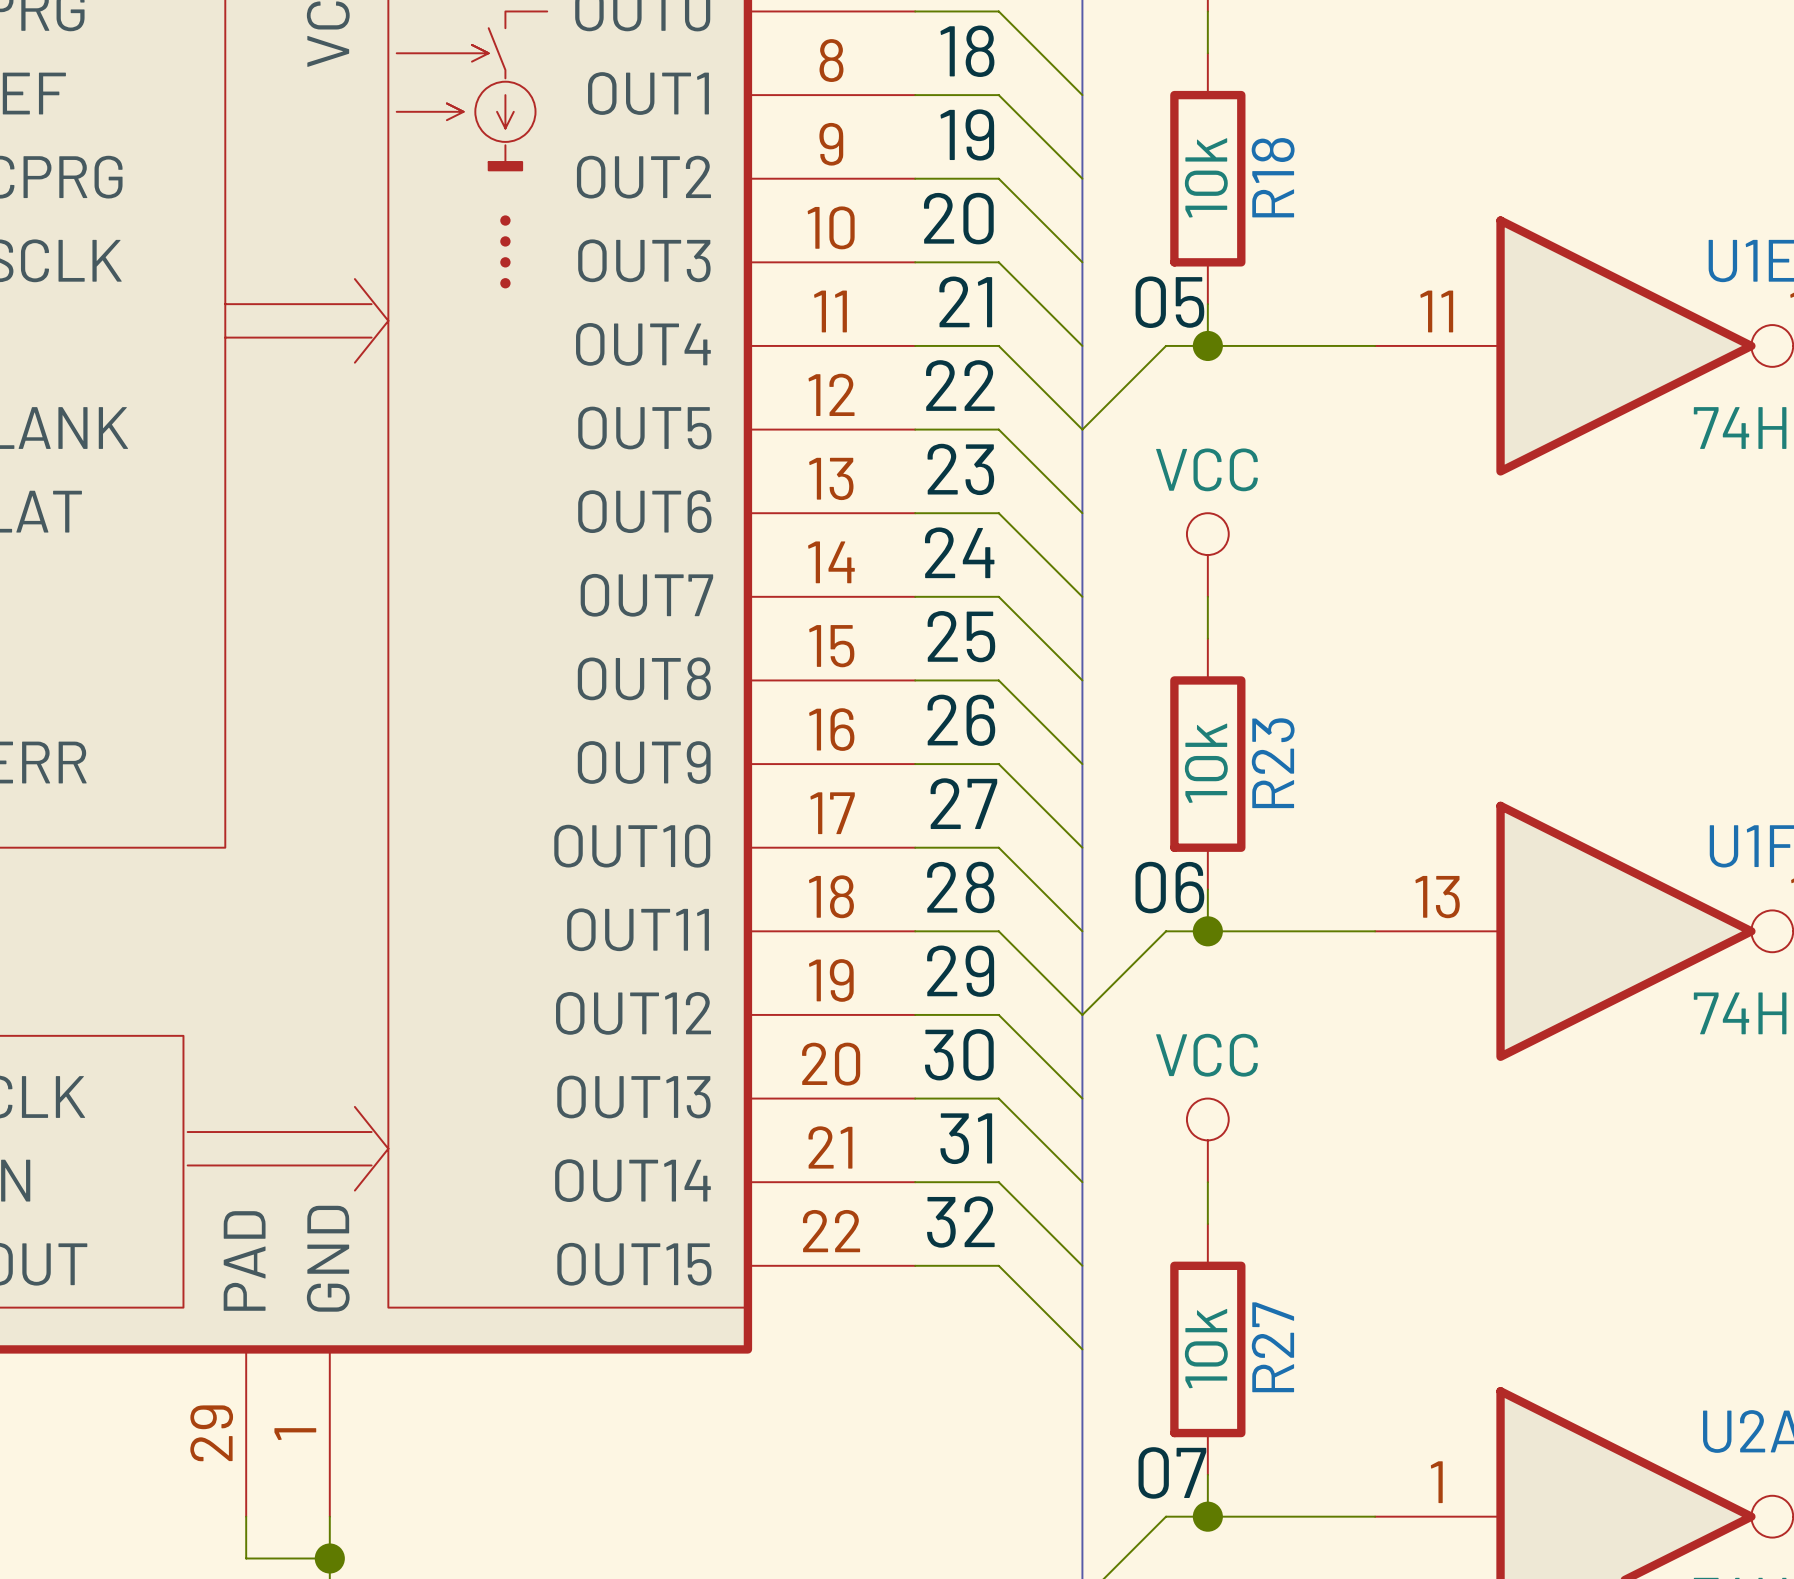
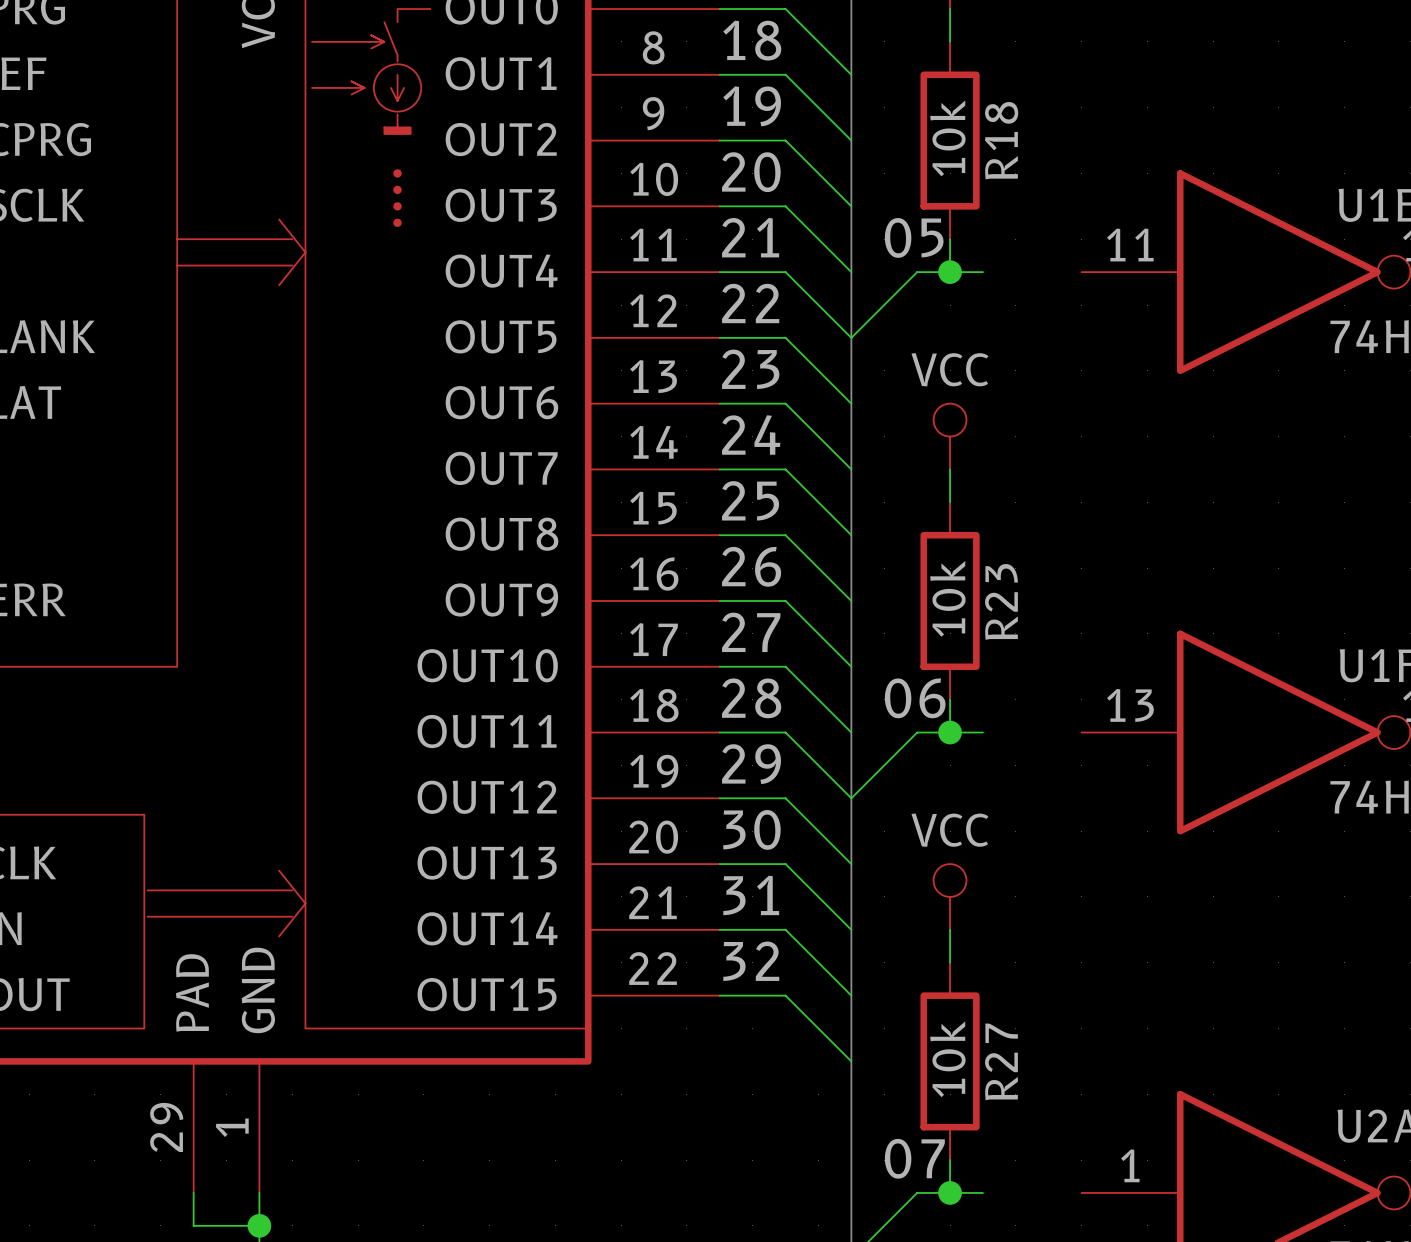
wire: (1249, 345) (1375, 345) -> none
wire: (1249, 931) (1375, 931) -> none
wire: (1249, 1516) (1375, 1516) -> none

